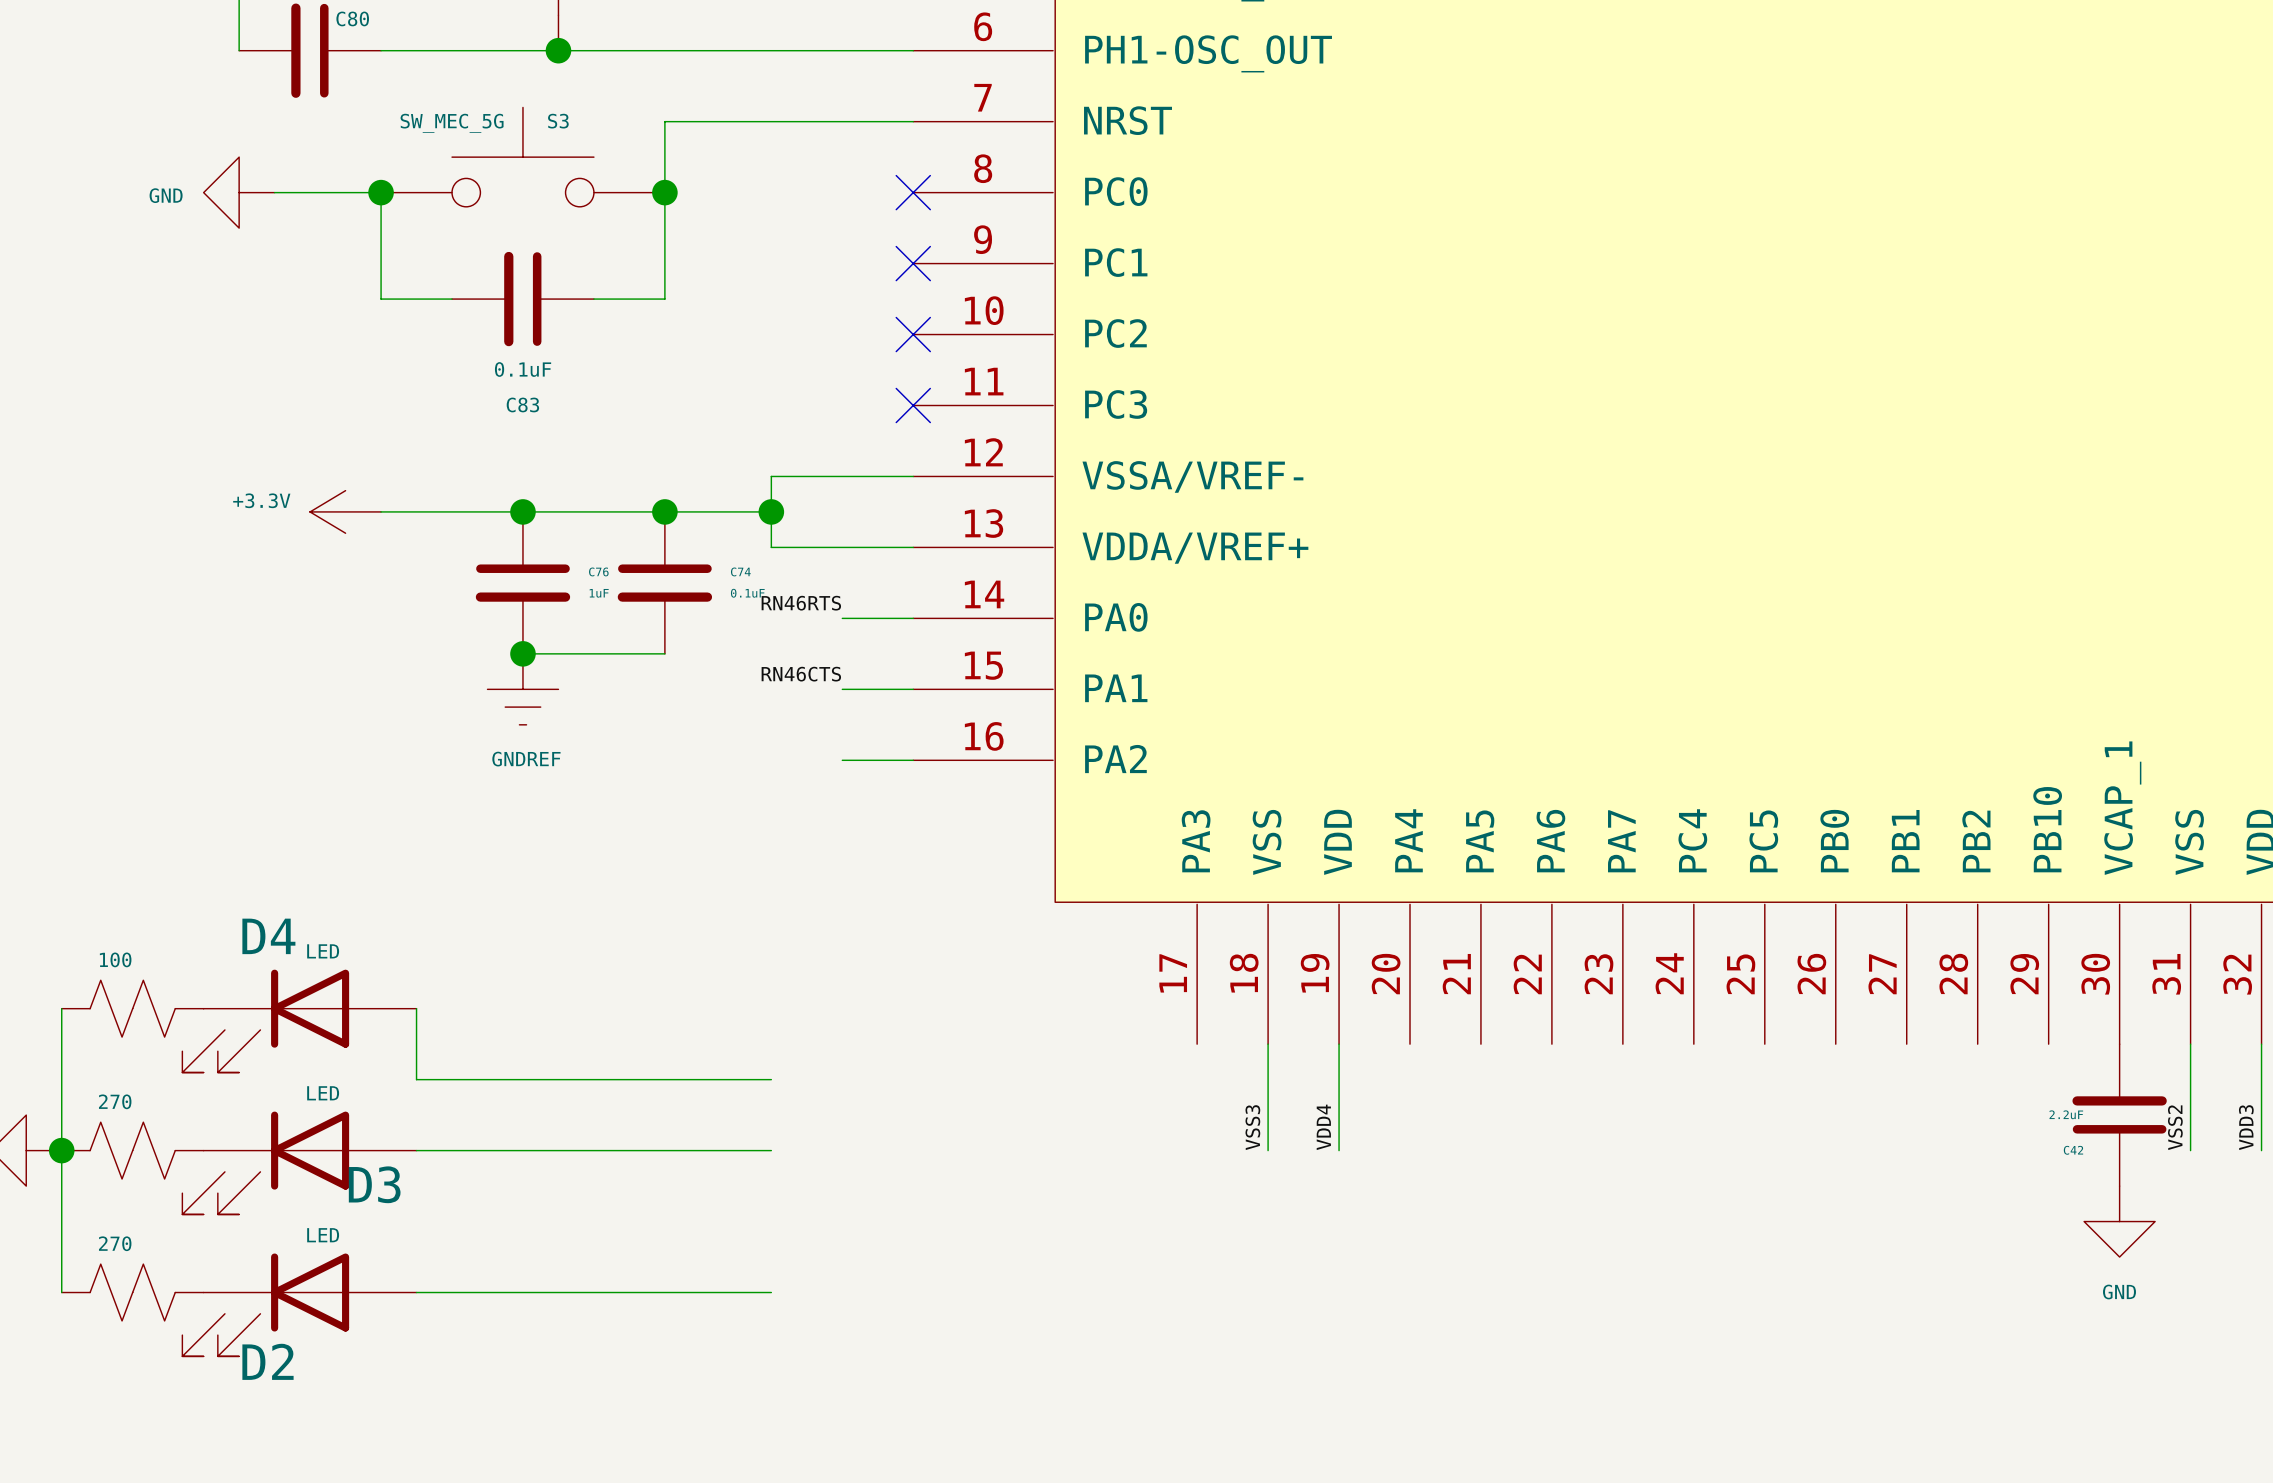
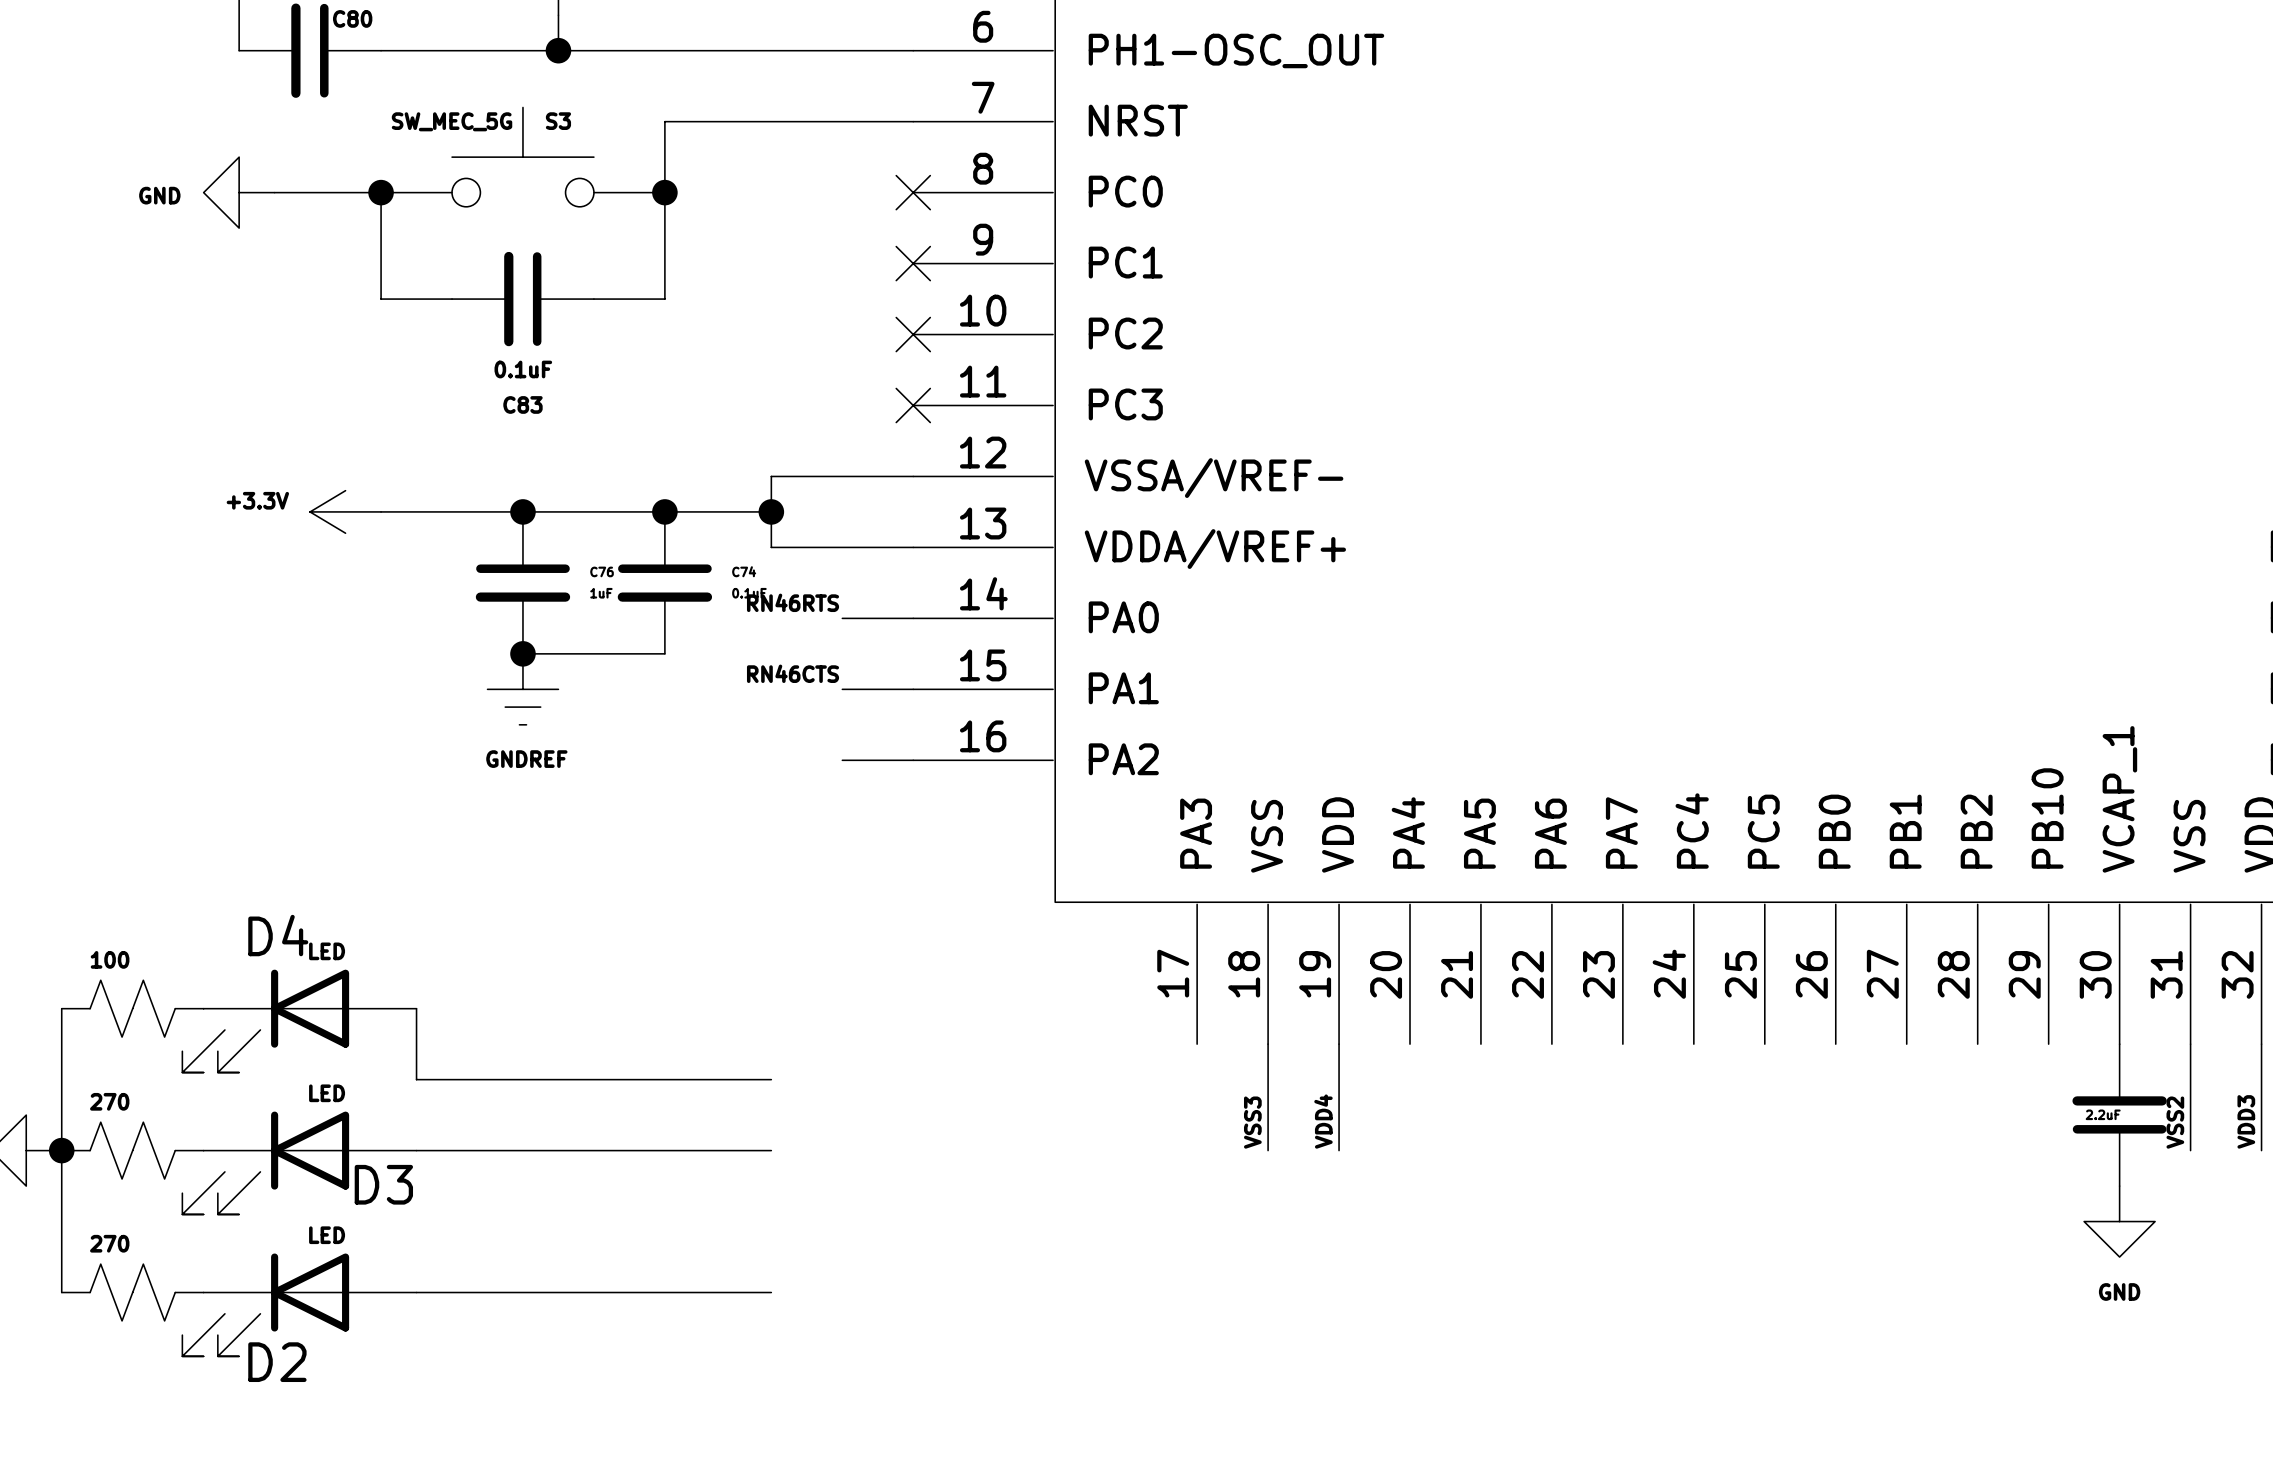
C42 value position: 2.2uF (2066, 1114) -> 2.2uF (2103, 1114)
C42 name: C42 (2073, 1150) -> none

